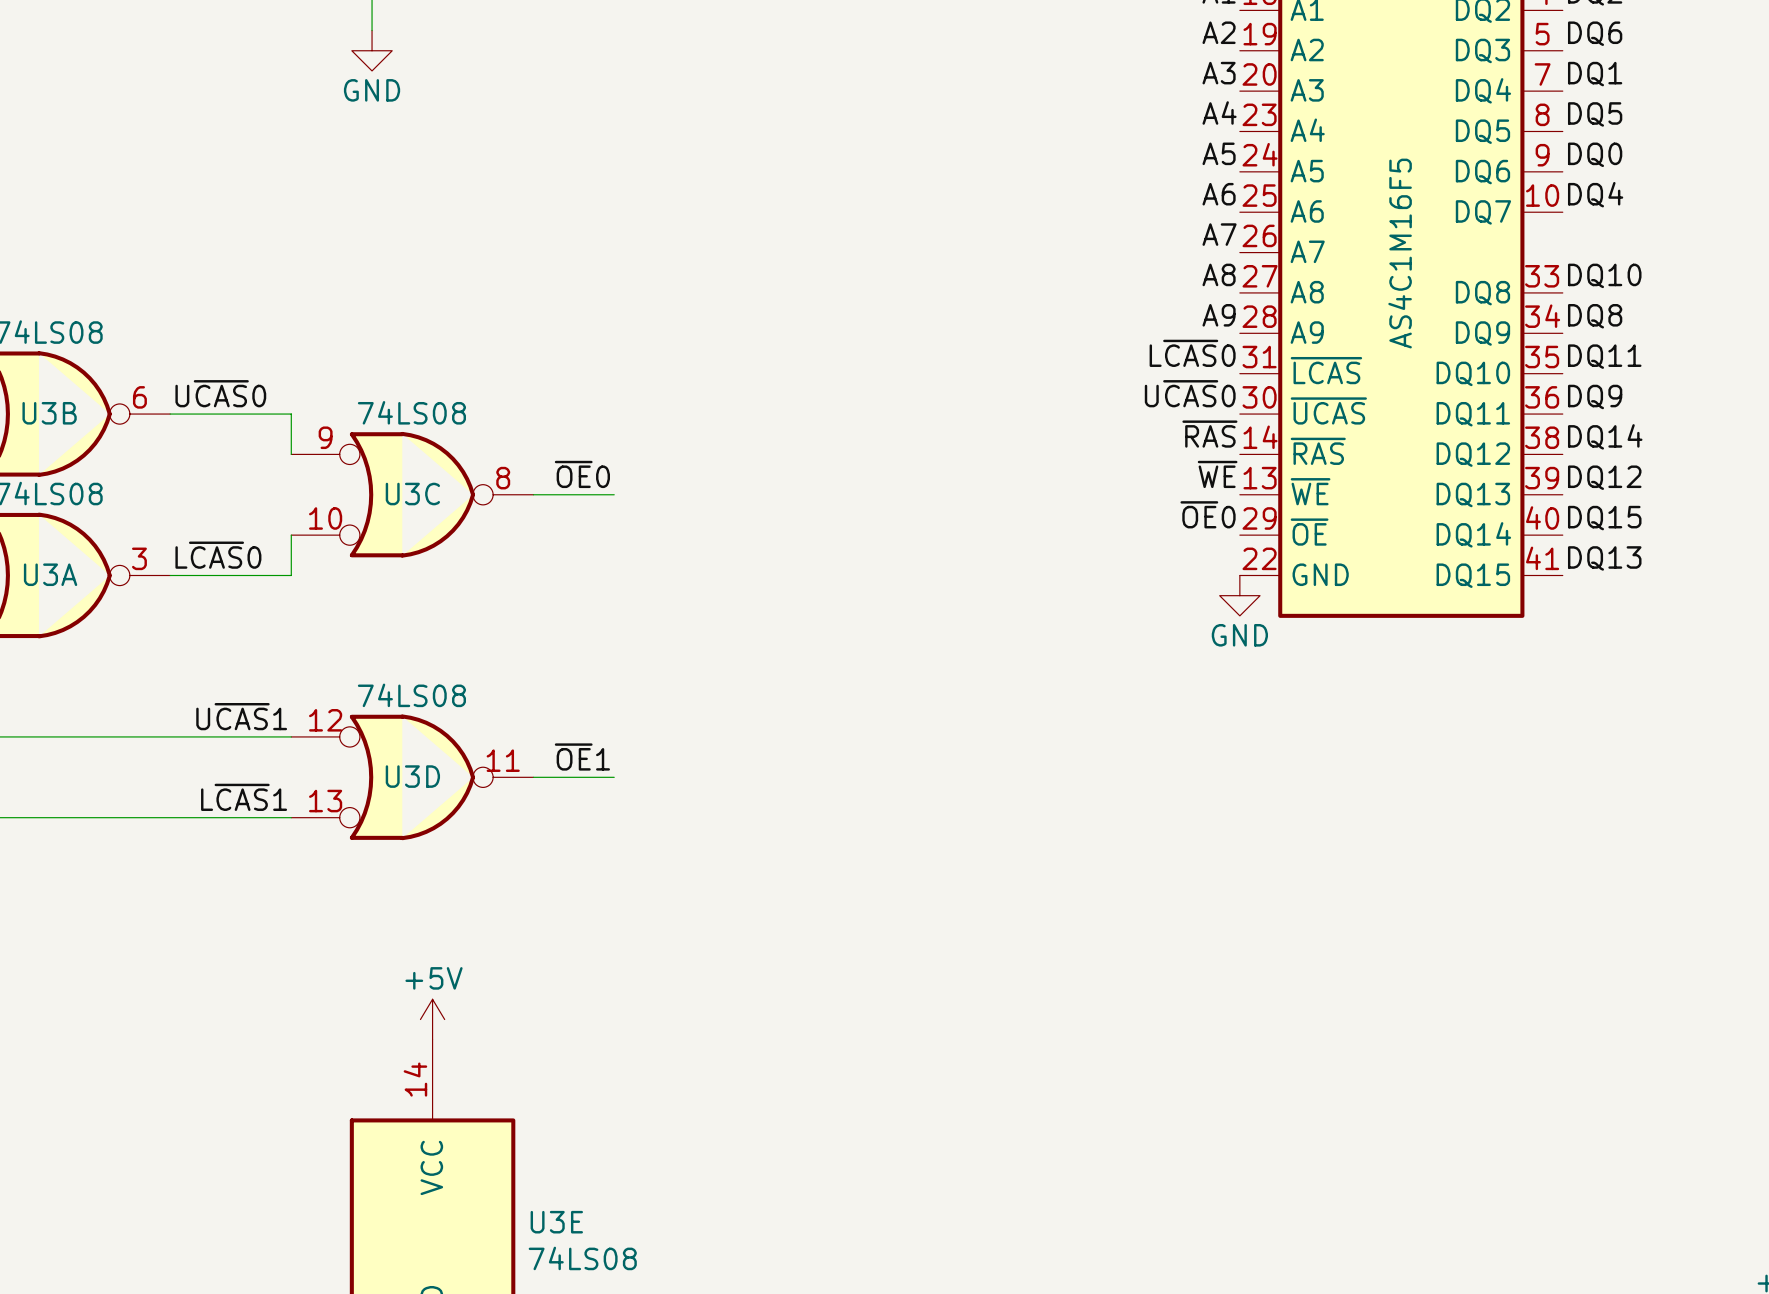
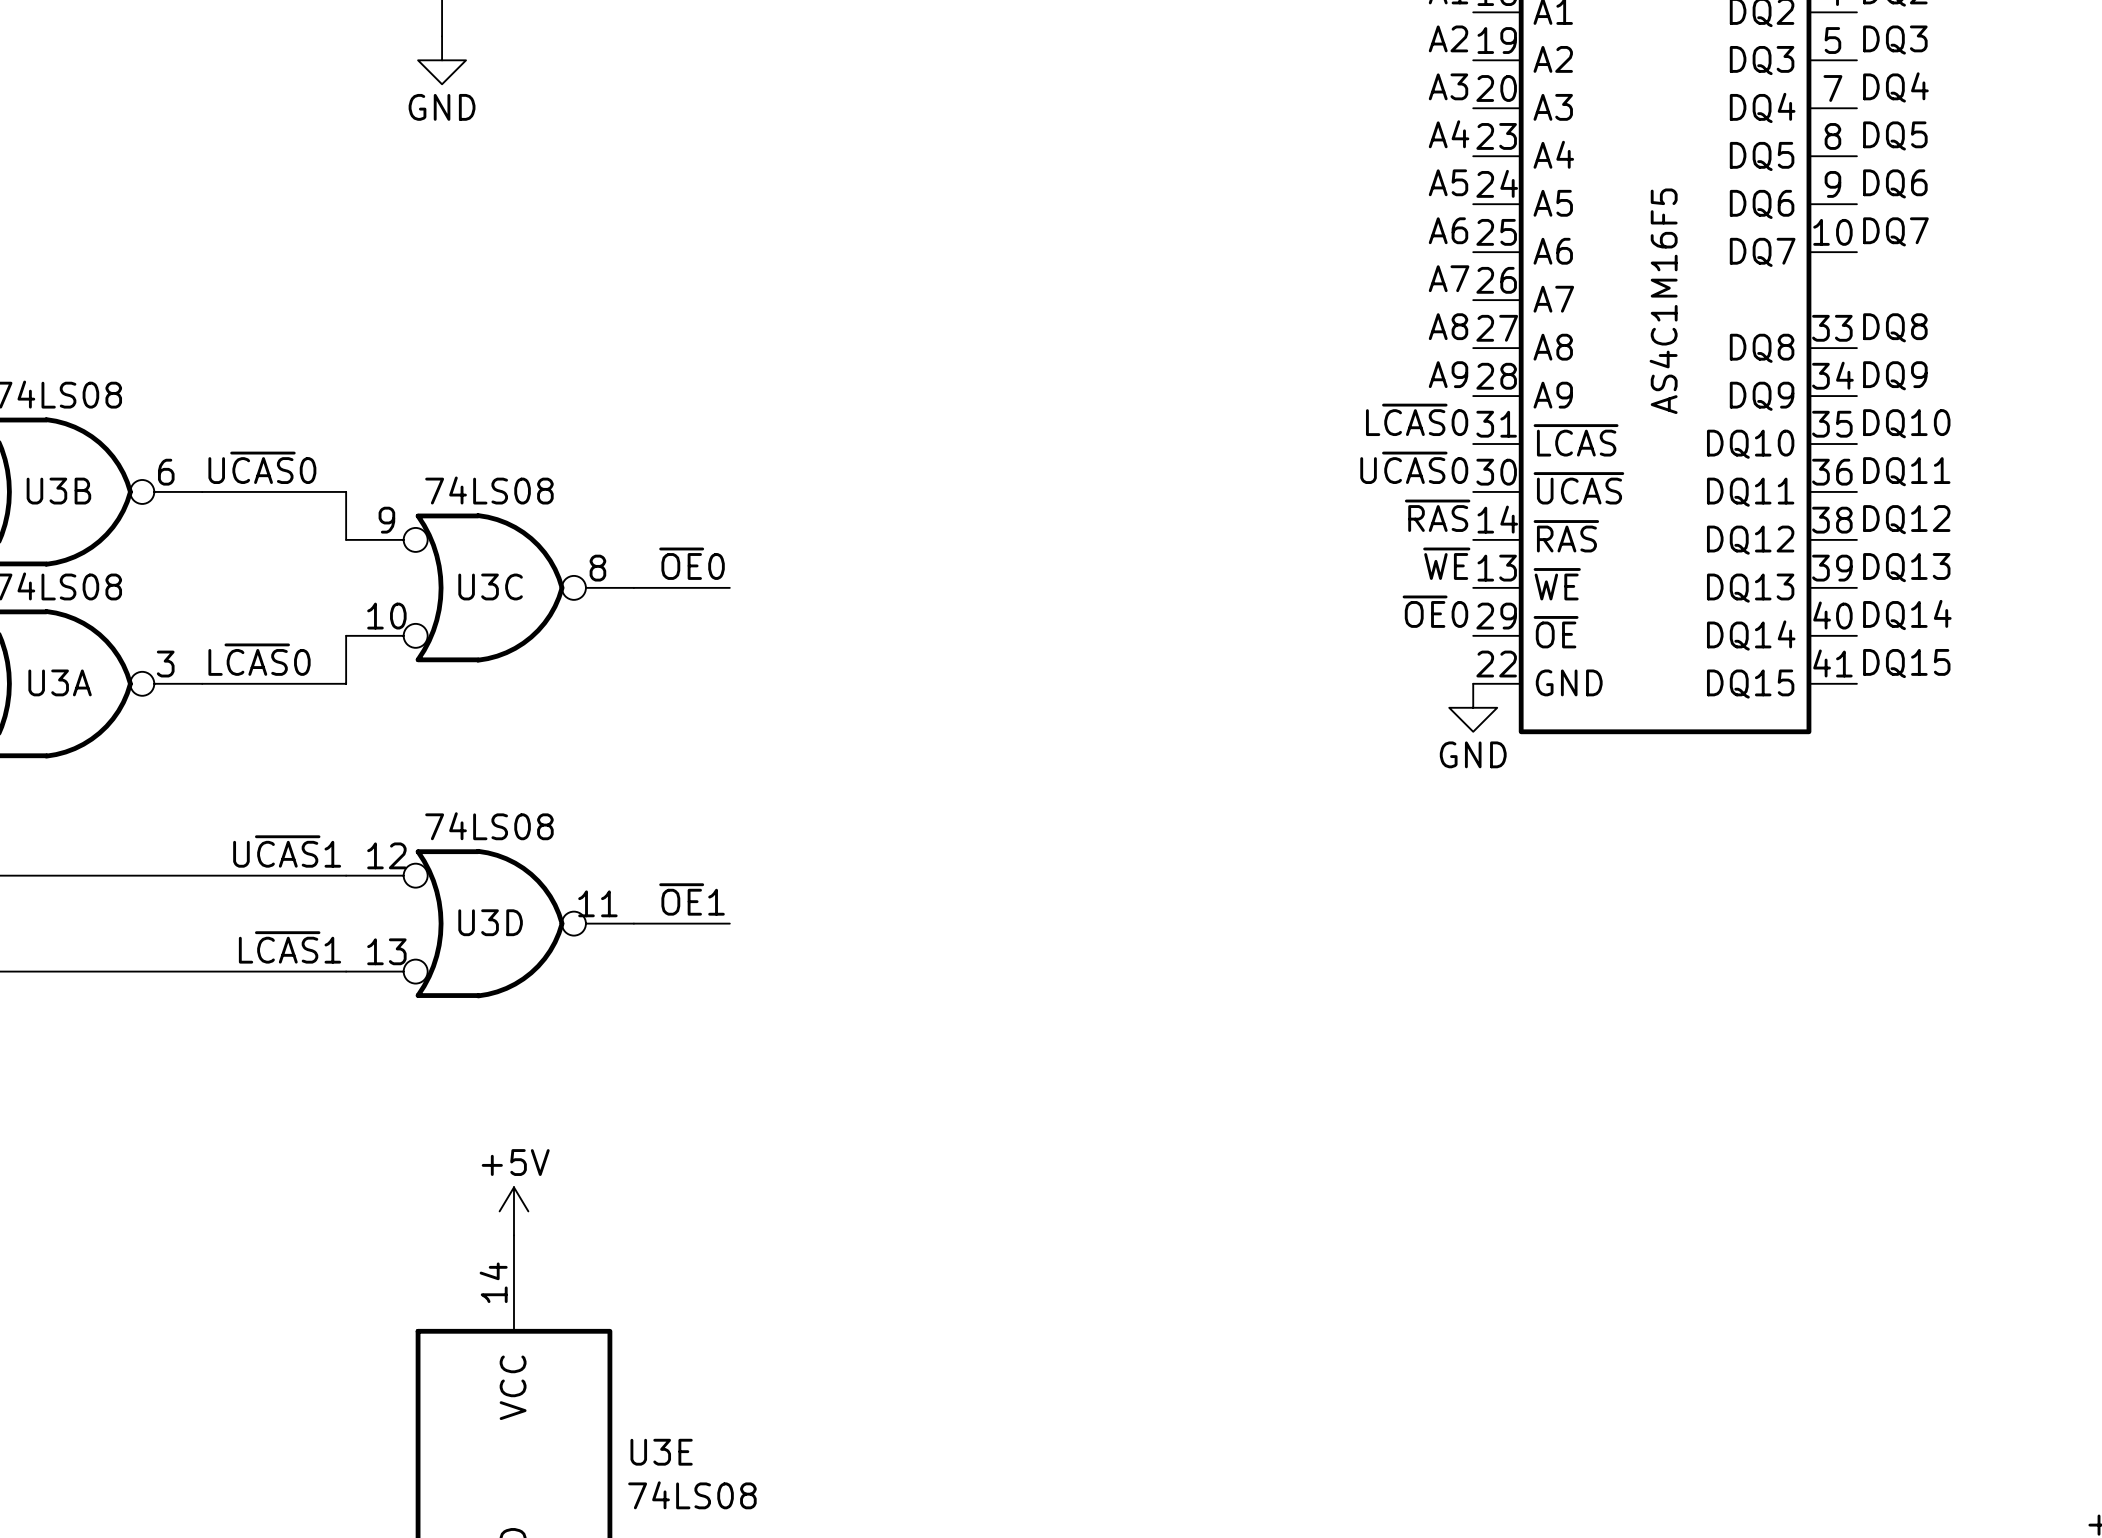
label: DQ6 (1595, 33) -> DQ3 (1895, 40)
label: DQ1 (1595, 74) -> DQ4 (1895, 87)
label: DQ0 (1595, 154) -> DQ6 (1895, 183)
label: DQ4 (1595, 194) -> DQ7 (1895, 231)
label: DQ10 (1604, 275) -> DQ8 (1895, 327)
label: DQ8 (1595, 316) -> DQ9 (1895, 375)
label: DQ11 (1604, 356) -> DQ10 (1906, 423)
label: DQ9 (1595, 396) -> DQ11 (1906, 471)
label: DQ14 (1605, 436) -> DQ12 (1906, 519)
label: DQ12 (1604, 477) -> DQ13 (1906, 567)
label: DQ15 (1604, 518) -> DQ14 (1907, 615)
label: DQ13 (1604, 558) -> DQ15 (1906, 663)

